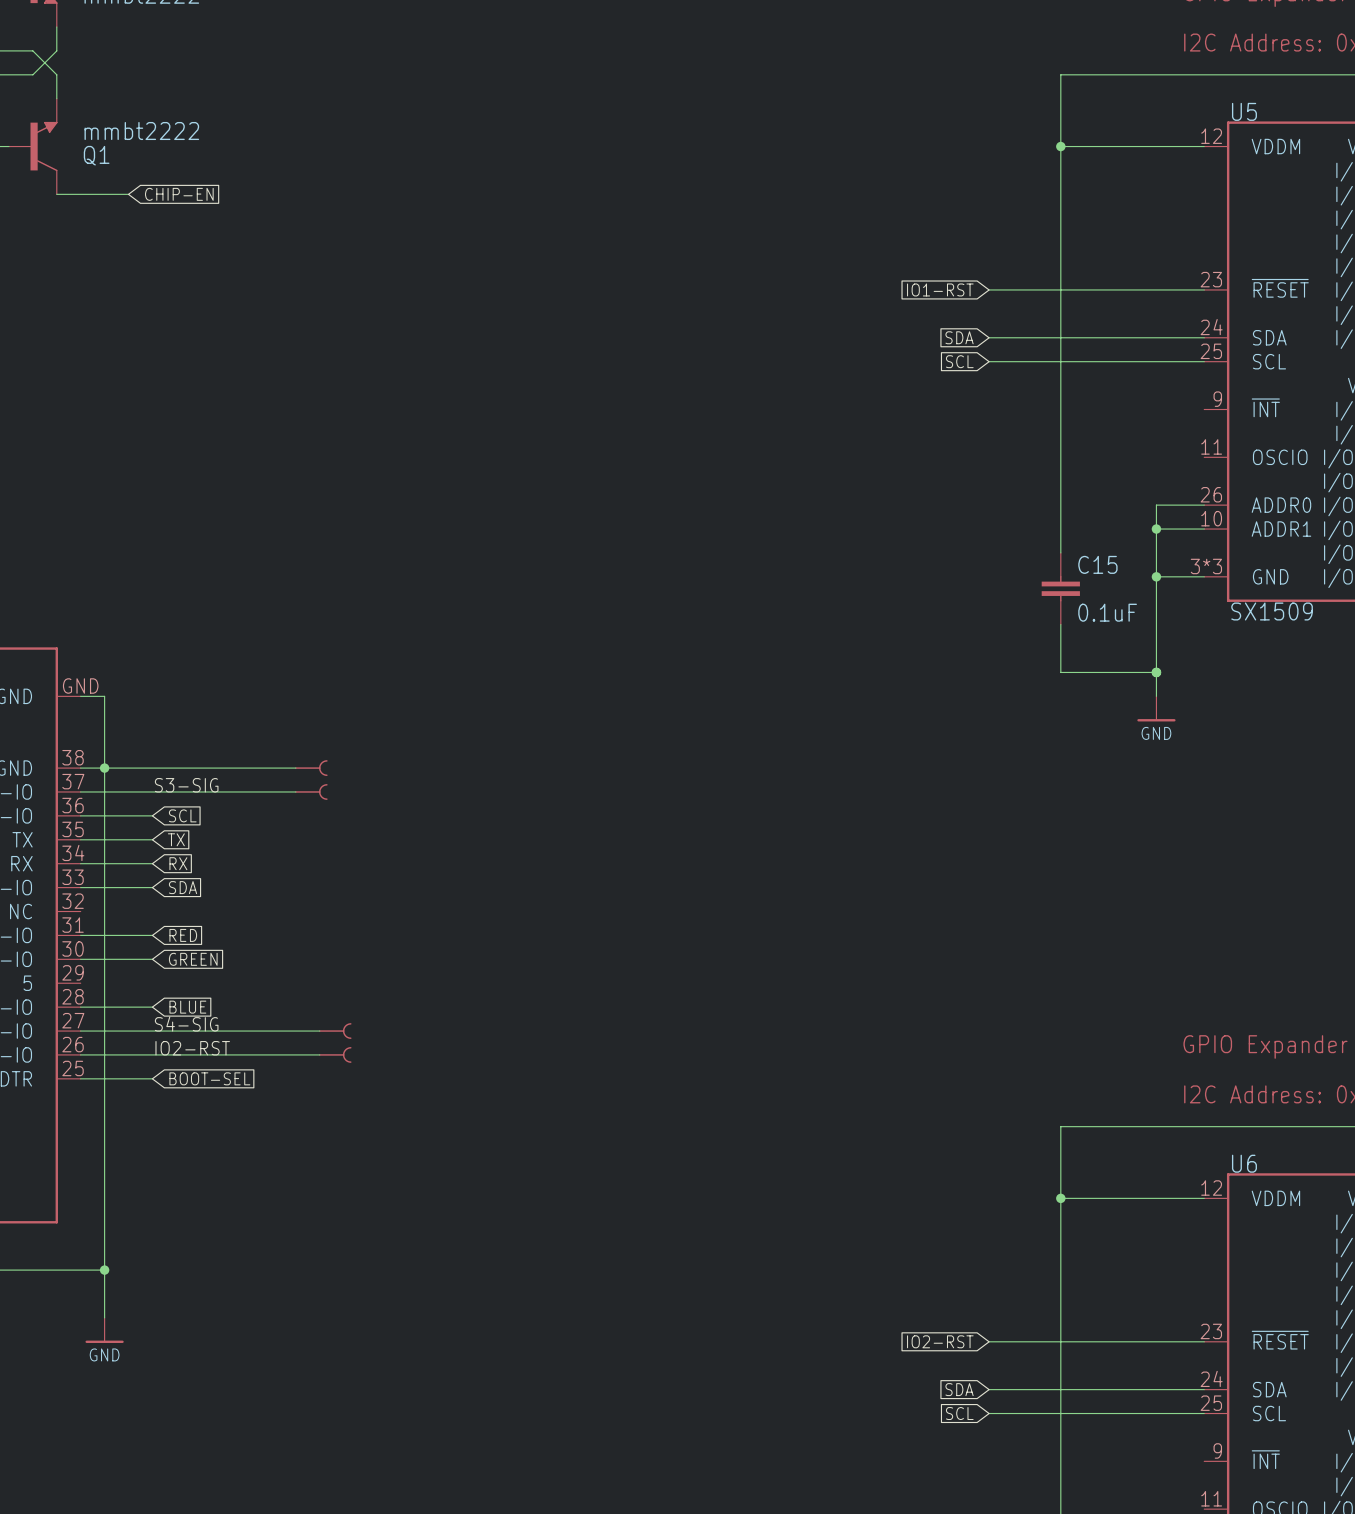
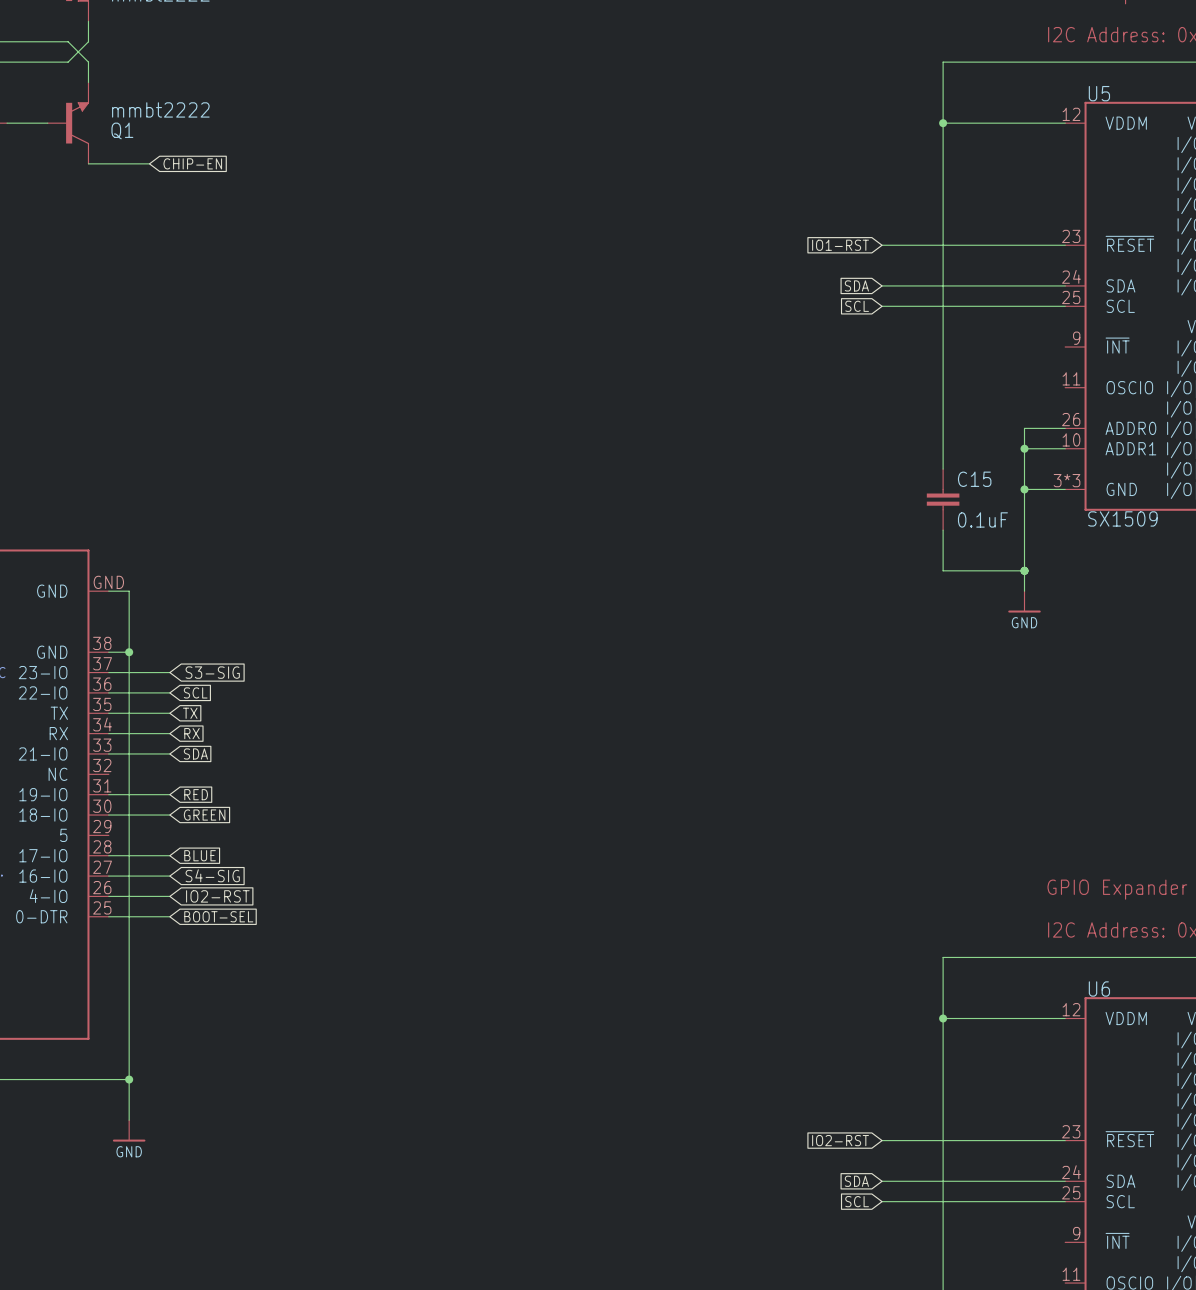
wire: (104, 768) (295, 768) -> none
part: (311, 768) -> none
label: S3-SIG (186, 785) -> none
wire: (152, 791) (295, 791) -> none
global label: none -> S3-SIG (212, 672)
part: (311, 791) -> none
label: S4-SIG (186, 1024) -> none
global label: none -> S4-SIG (212, 875)
wire: (152, 1031) (319, 1031) -> none
part: (335, 1031) -> none
label: IO2-RST (192, 1048) -> none
wire: (152, 1054) (319, 1054) -> none
global label: none -> IO2-RST (217, 896)
part: (335, 1054) -> none

